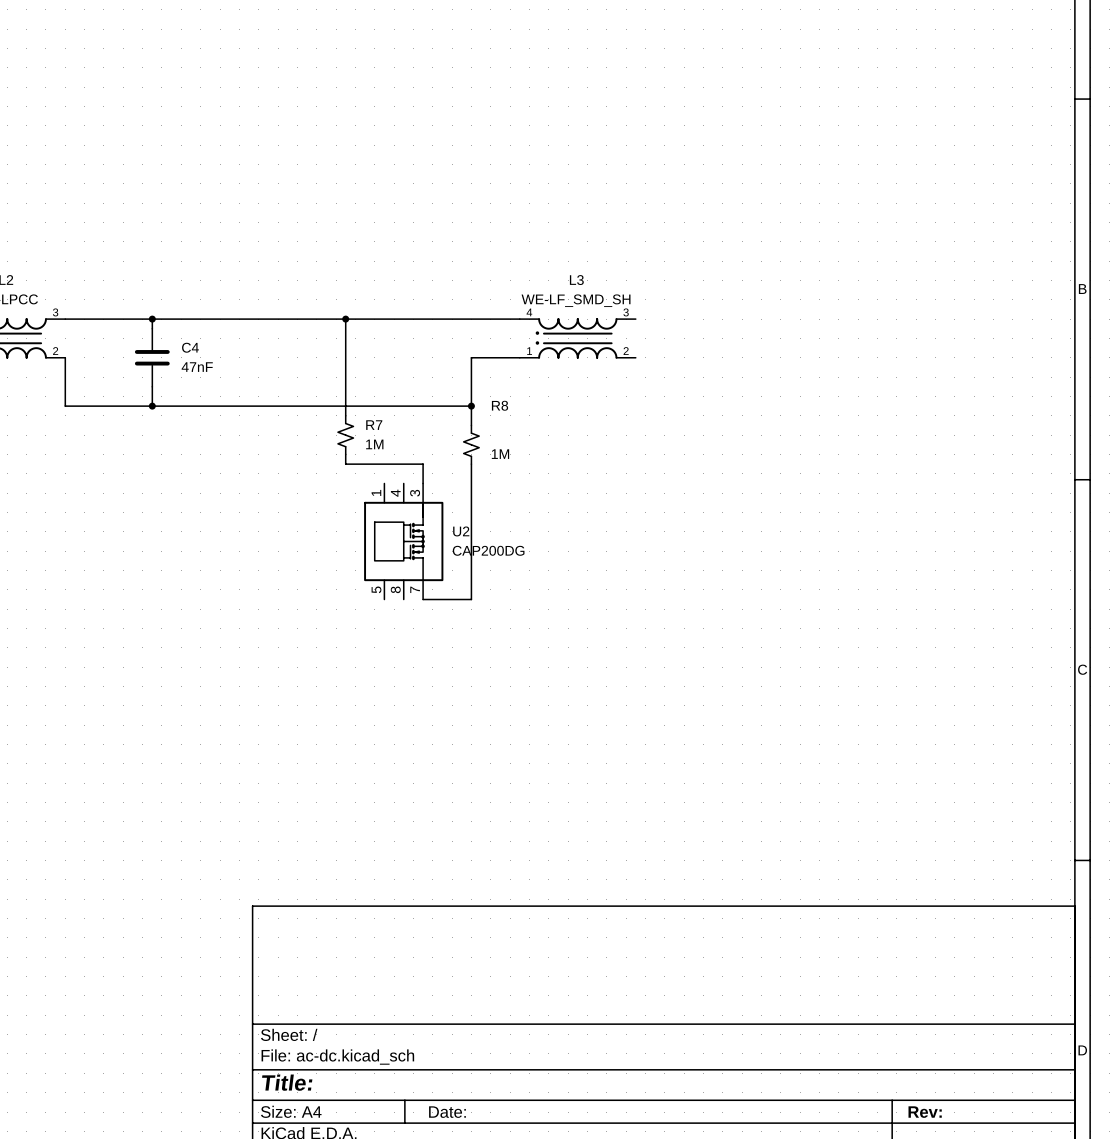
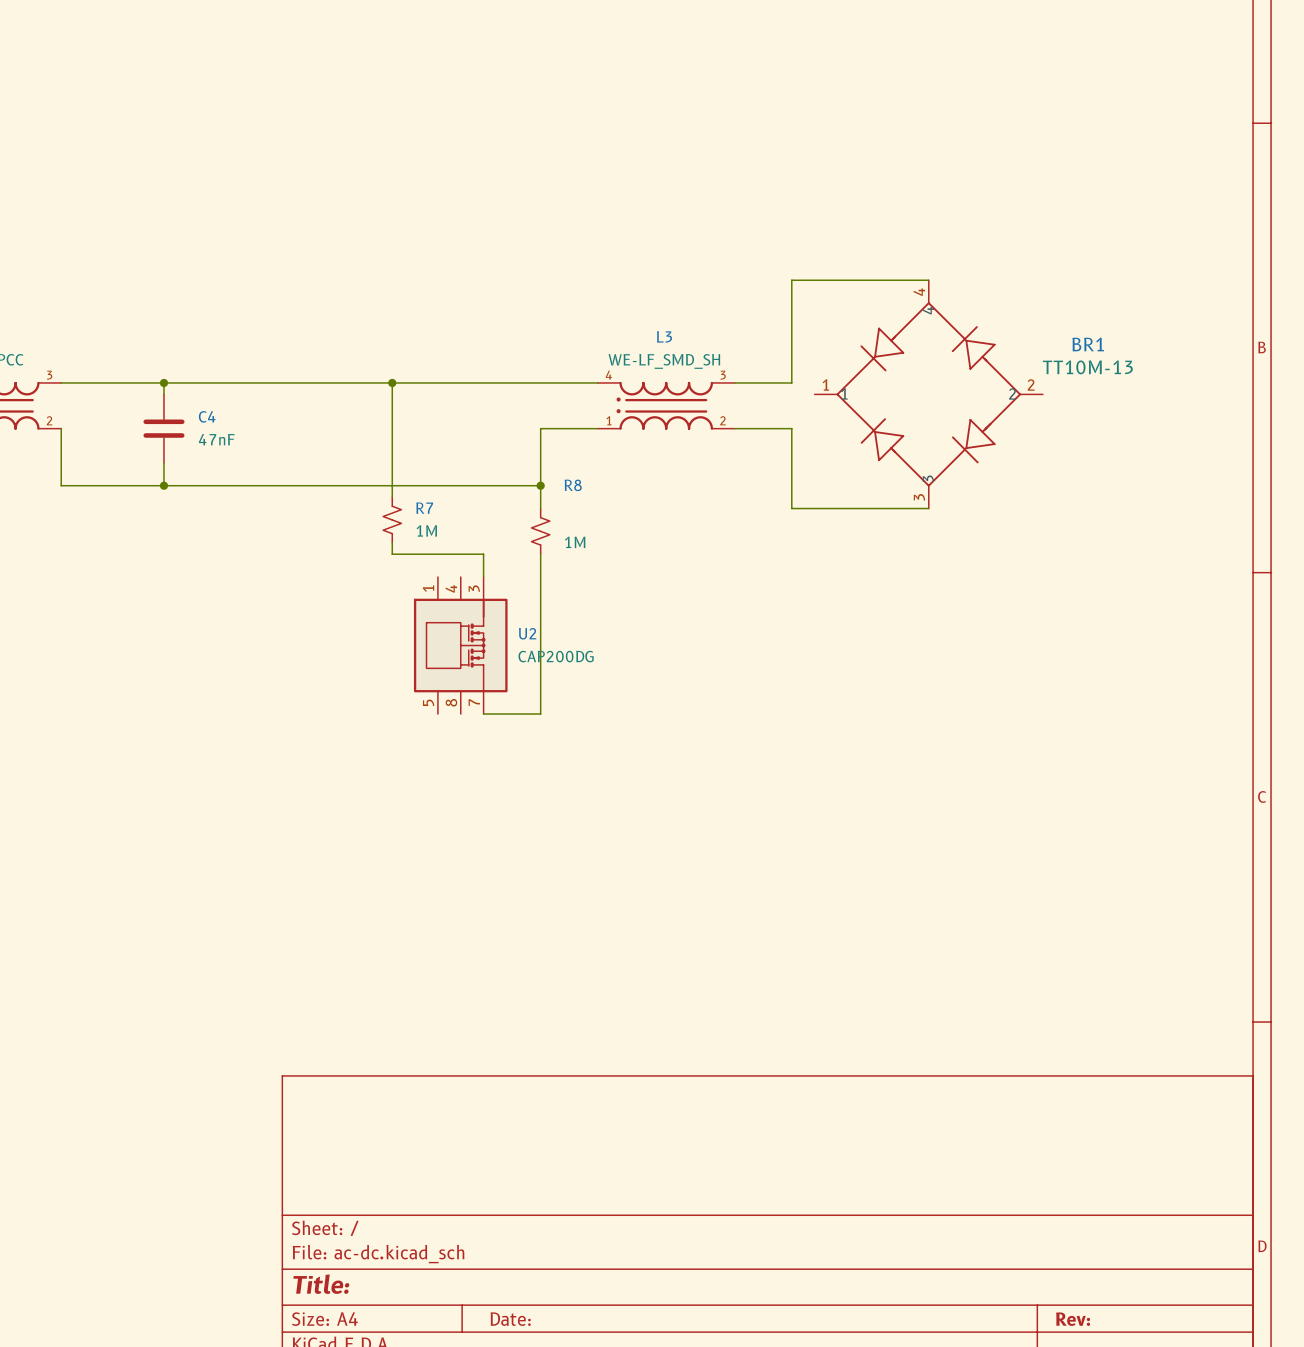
wire: none -> (928, 280) (791, 280) (791, 382) (734, 382)
BR1: none -> TT10M-13 (928, 394)
wire: none -> (734, 428) (791, 428) (791, 508) (928, 508)

